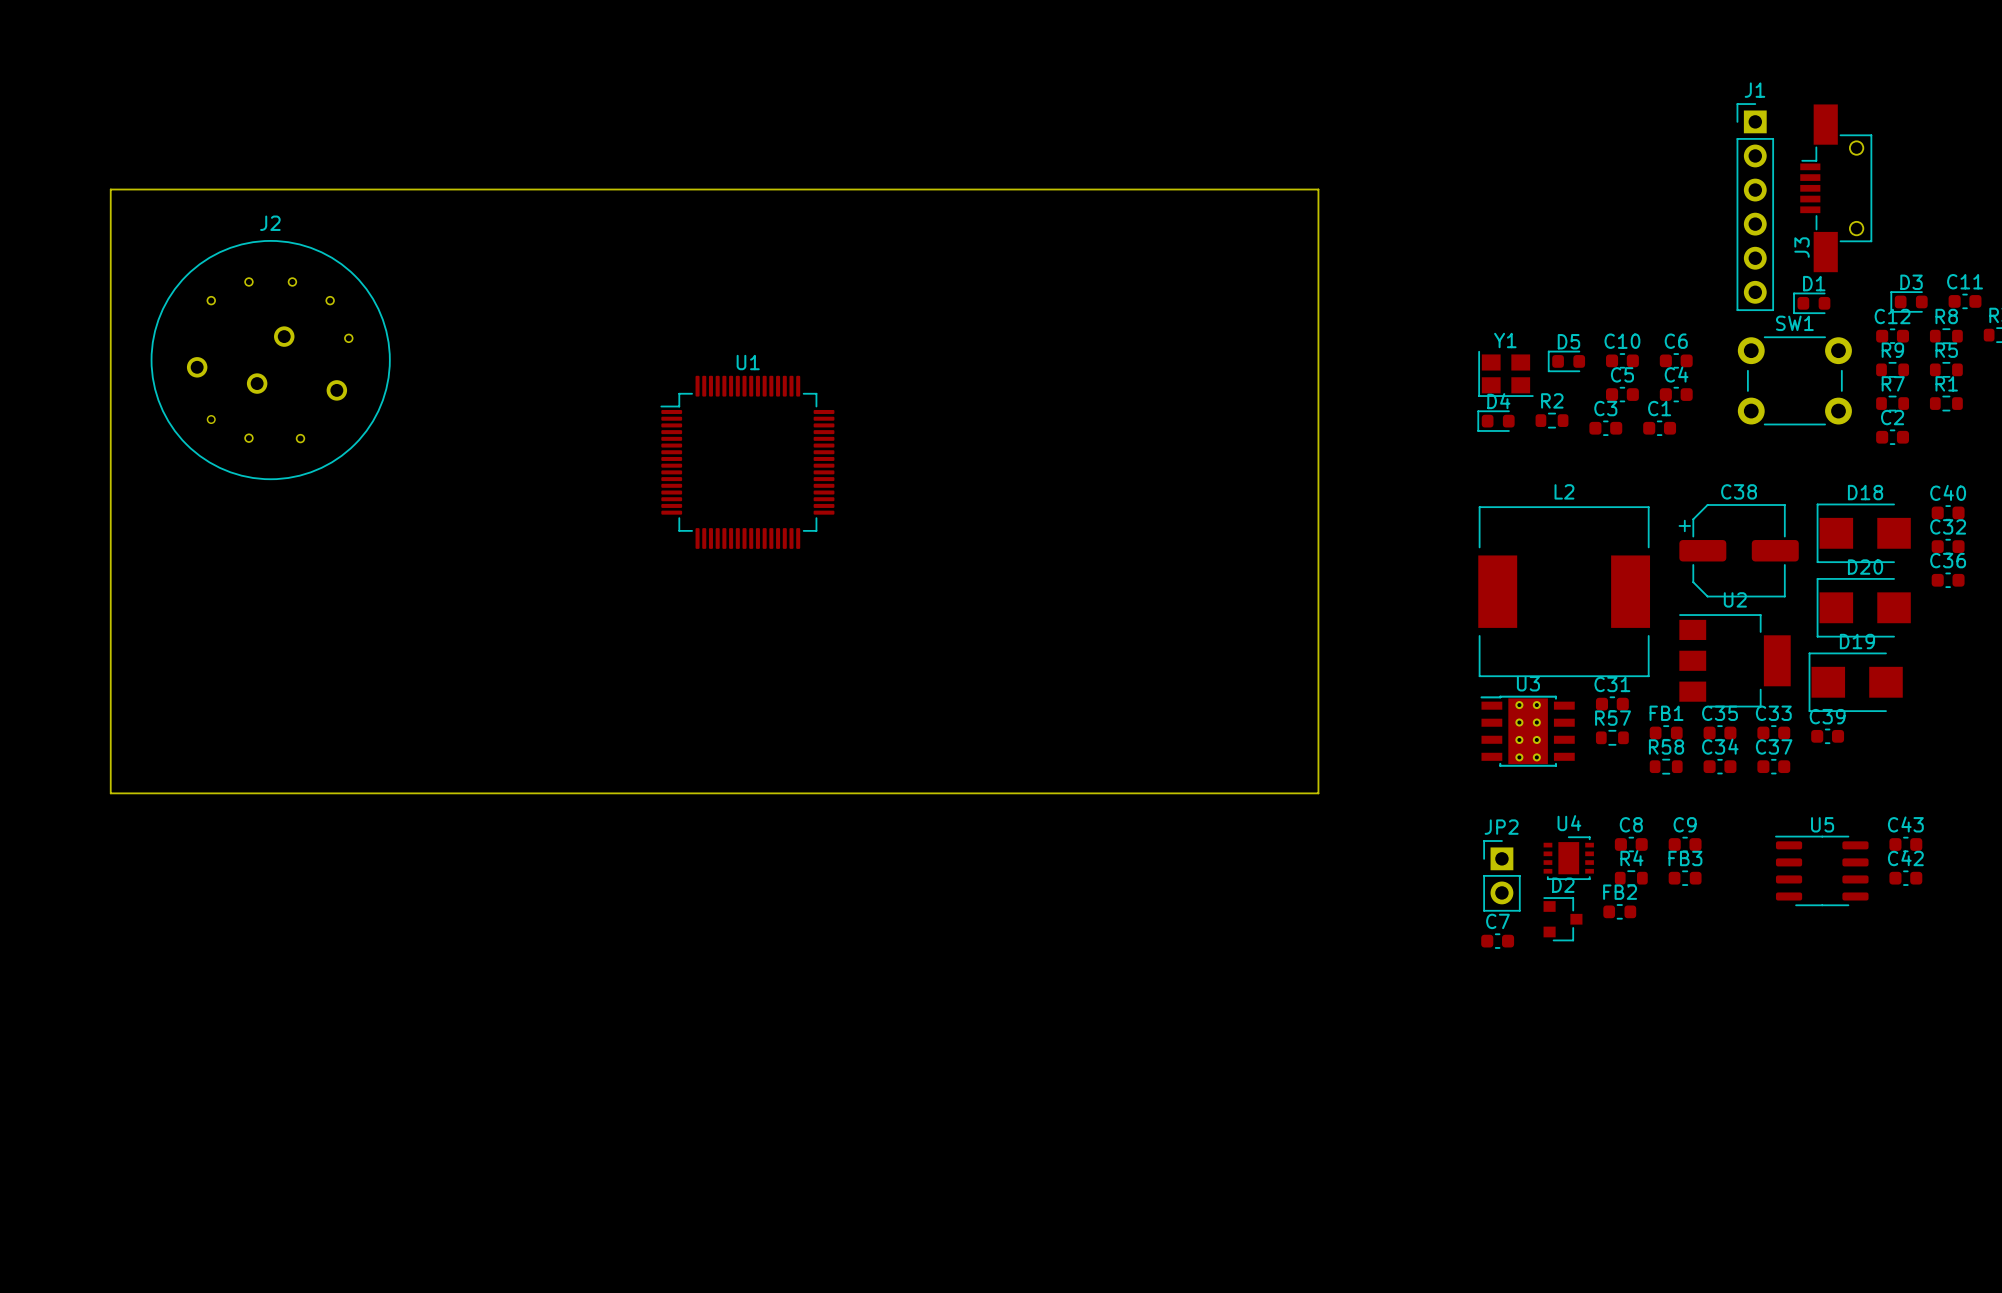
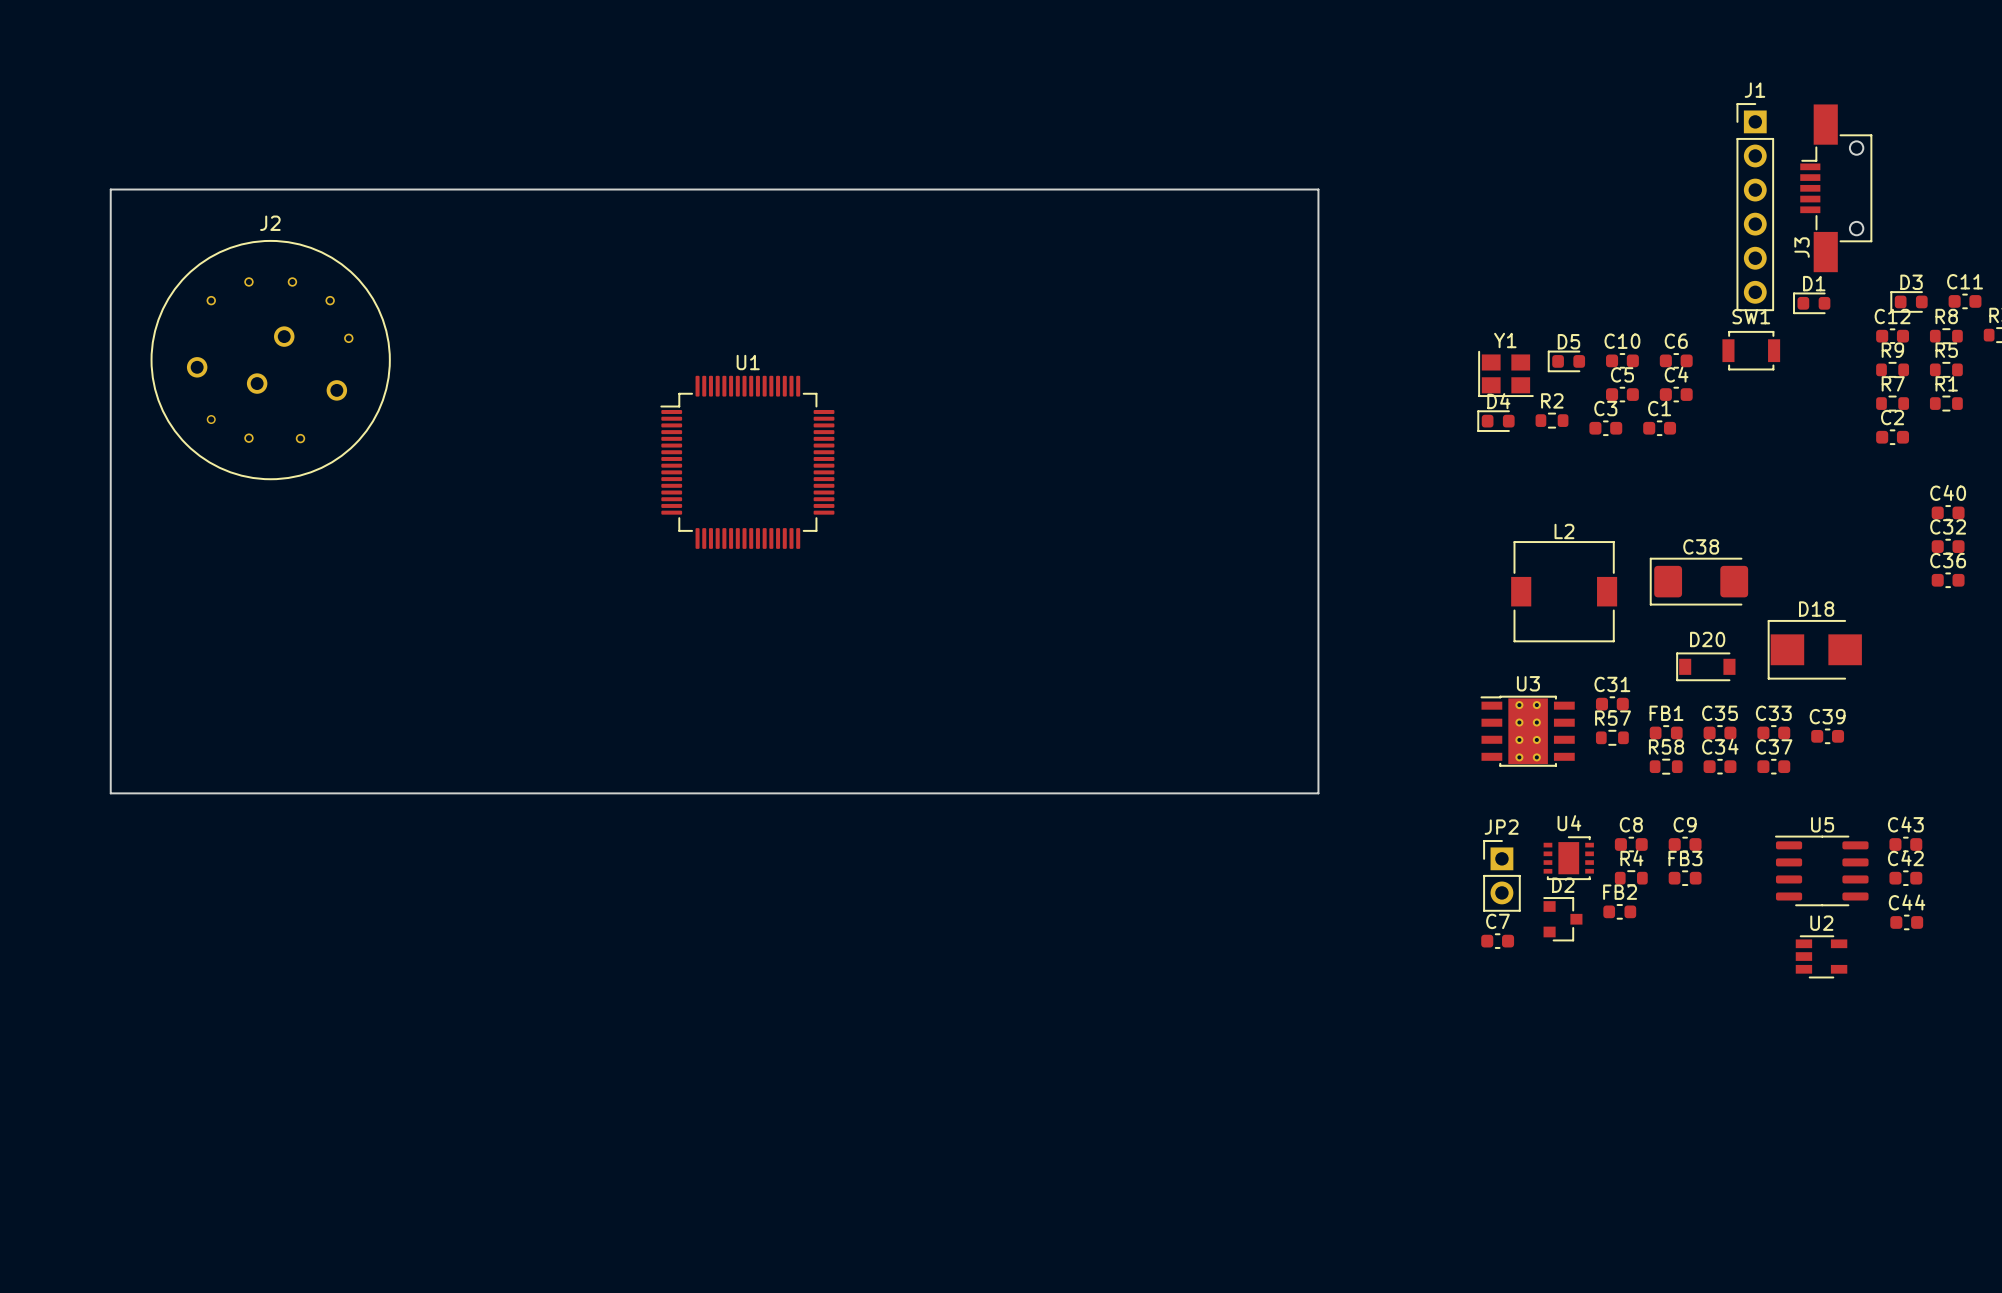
SW1 footprint: [1737, 336, 1852, 426] -> [1722, 331, 1781, 371]
L2 name position: L2 (1564, 491) -> L2 (1564, 531)
C38 footprint: [1678, 504, 1799, 598] -> [1649, 557, 1749, 606]
L2 footprint: [1478, 506, 1651, 678] -> [1511, 541, 1618, 643]
D18 position: (1863, 533) -> (1814, 649)
D20 footprint: [1816, 578, 1911, 638] -> [1676, 652, 1736, 682]
U2 name position: U2 (1735, 599) -> U2 (1821, 923)
U2 footprint: [1679, 614, 1791, 708] -> [1795, 935, 1848, 979]
D19: (1855, 682) -> none
C44: none -> (1906, 922)

